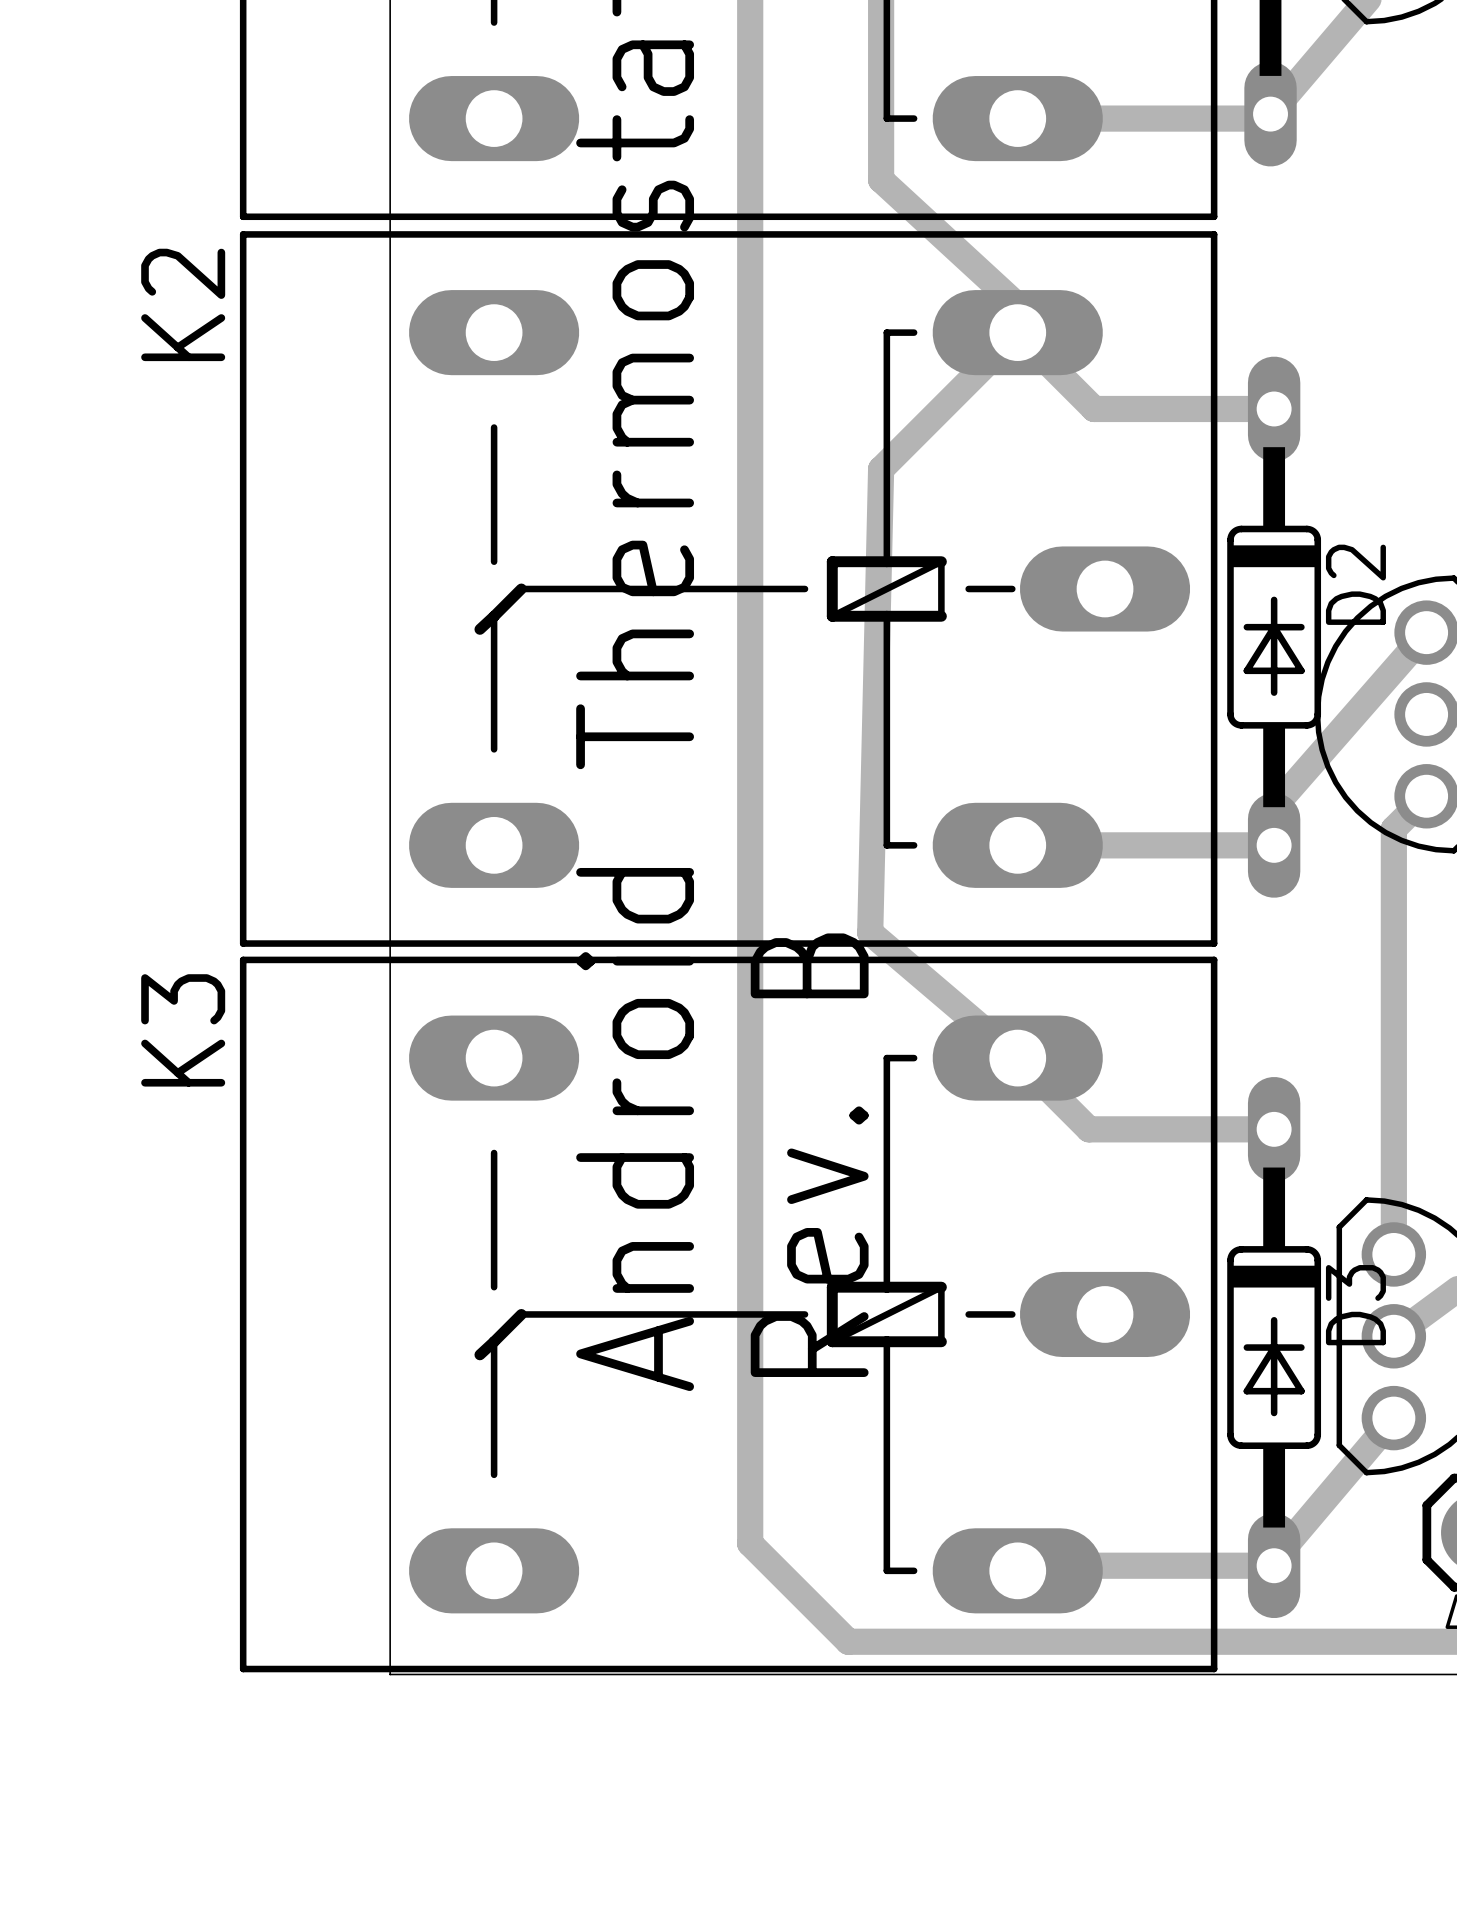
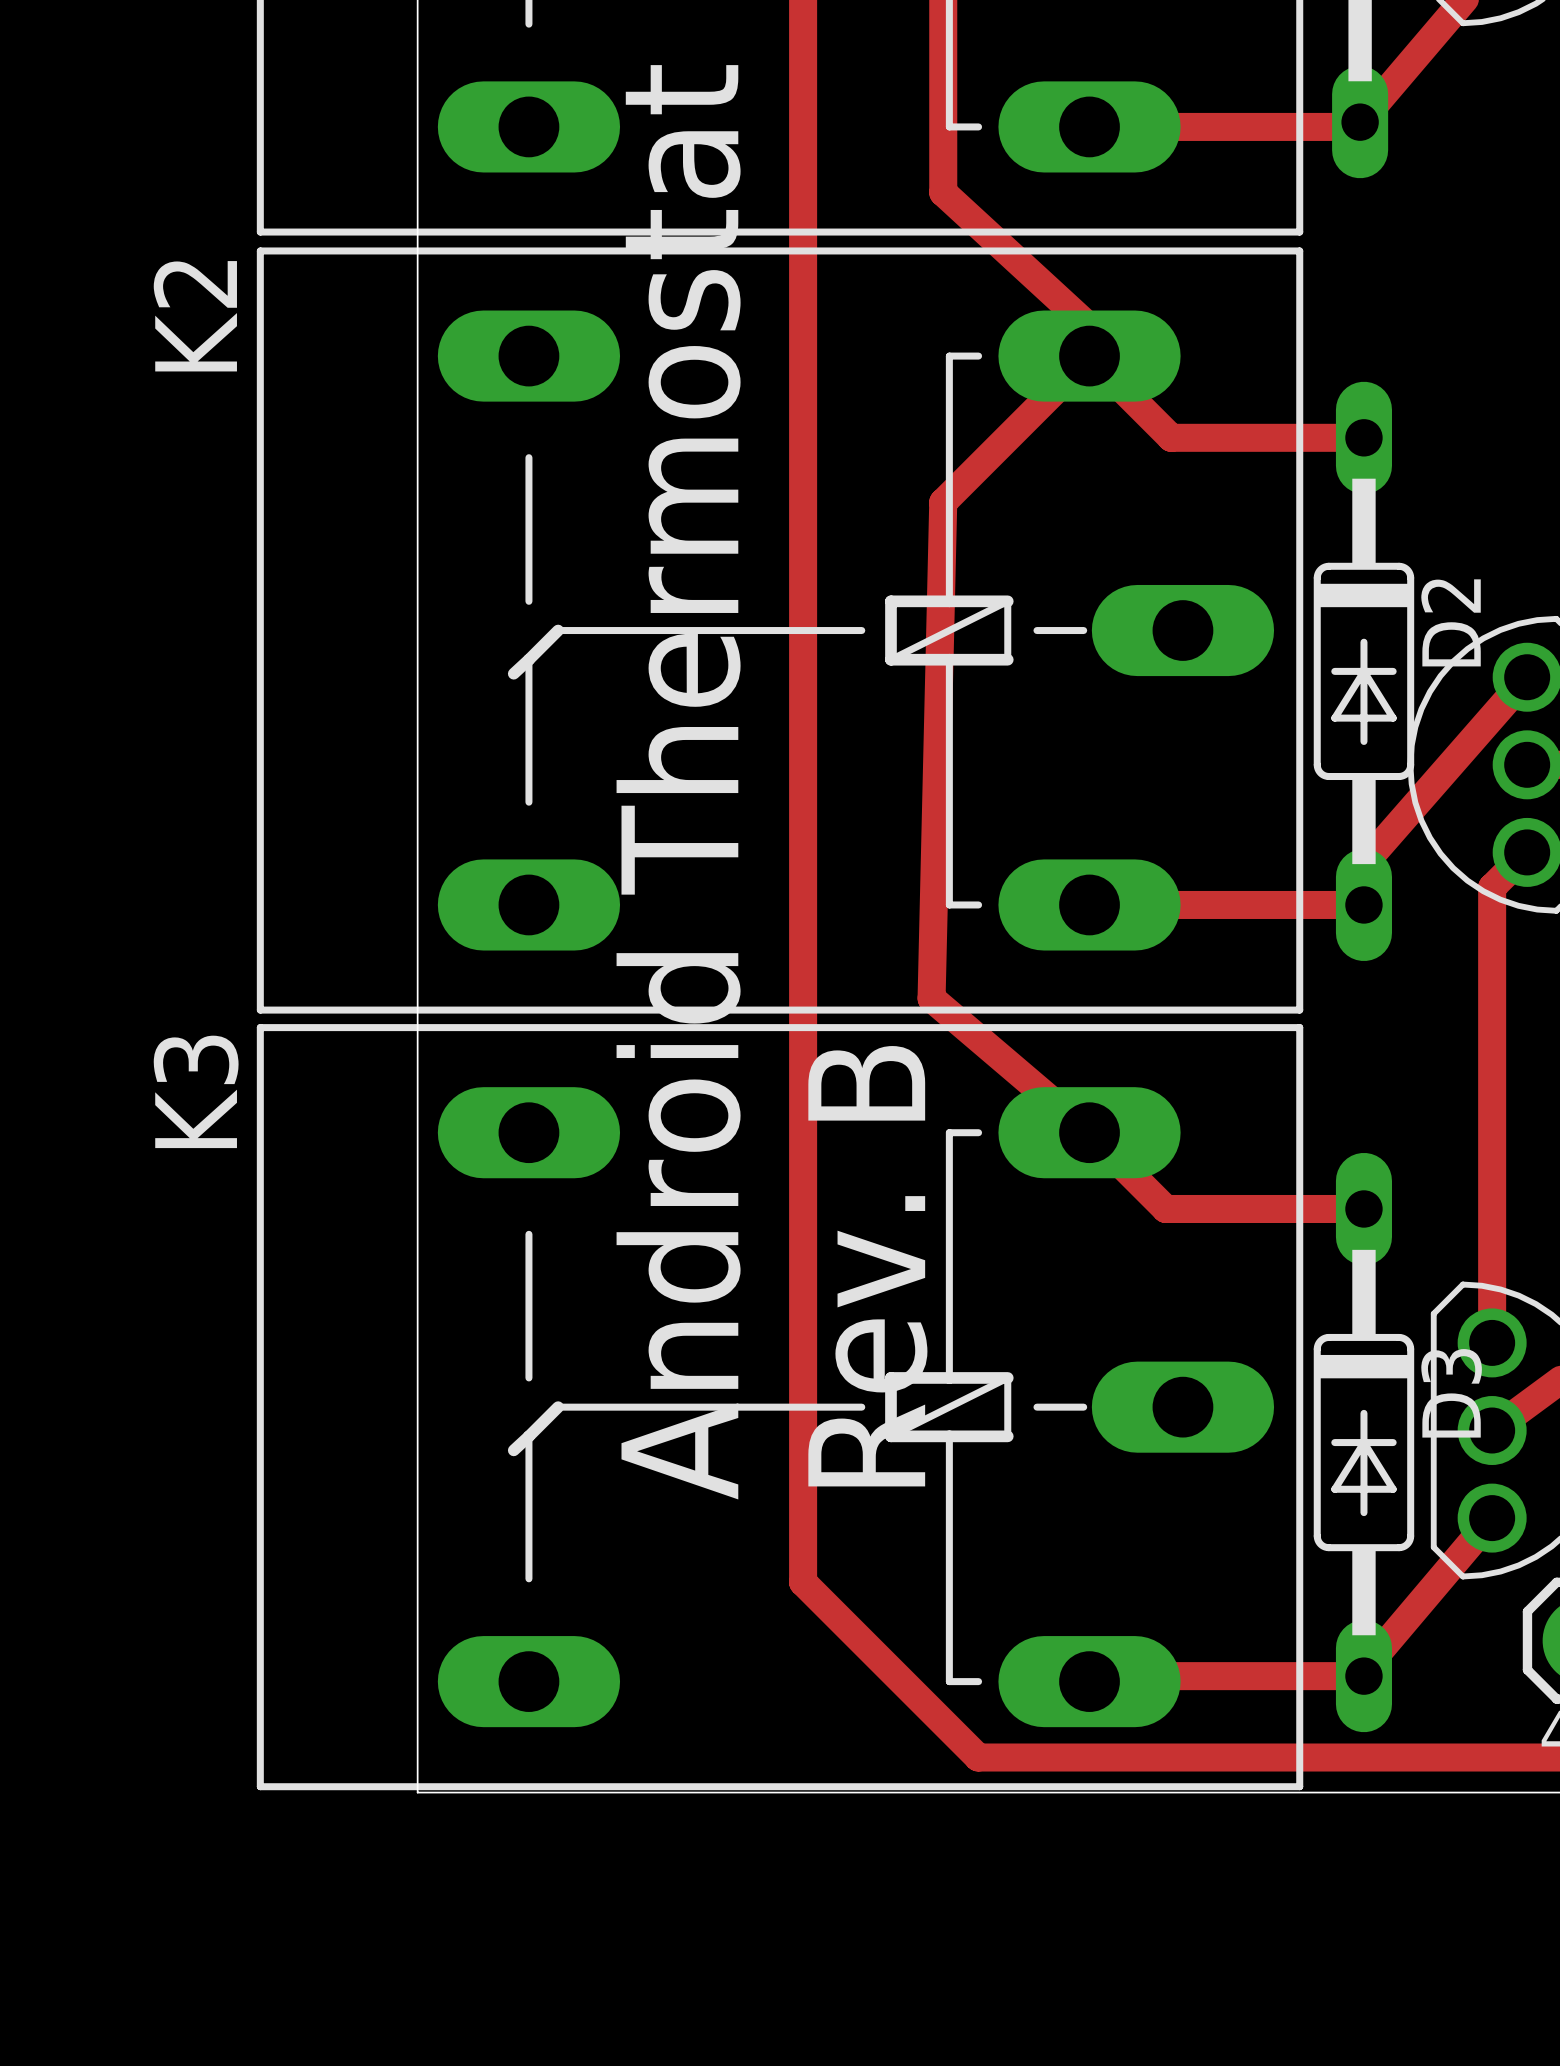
track: (750, 1478) (750, 1543) (848, 1641) (913, 1641) -> (803, 1582) (978, 1757)

